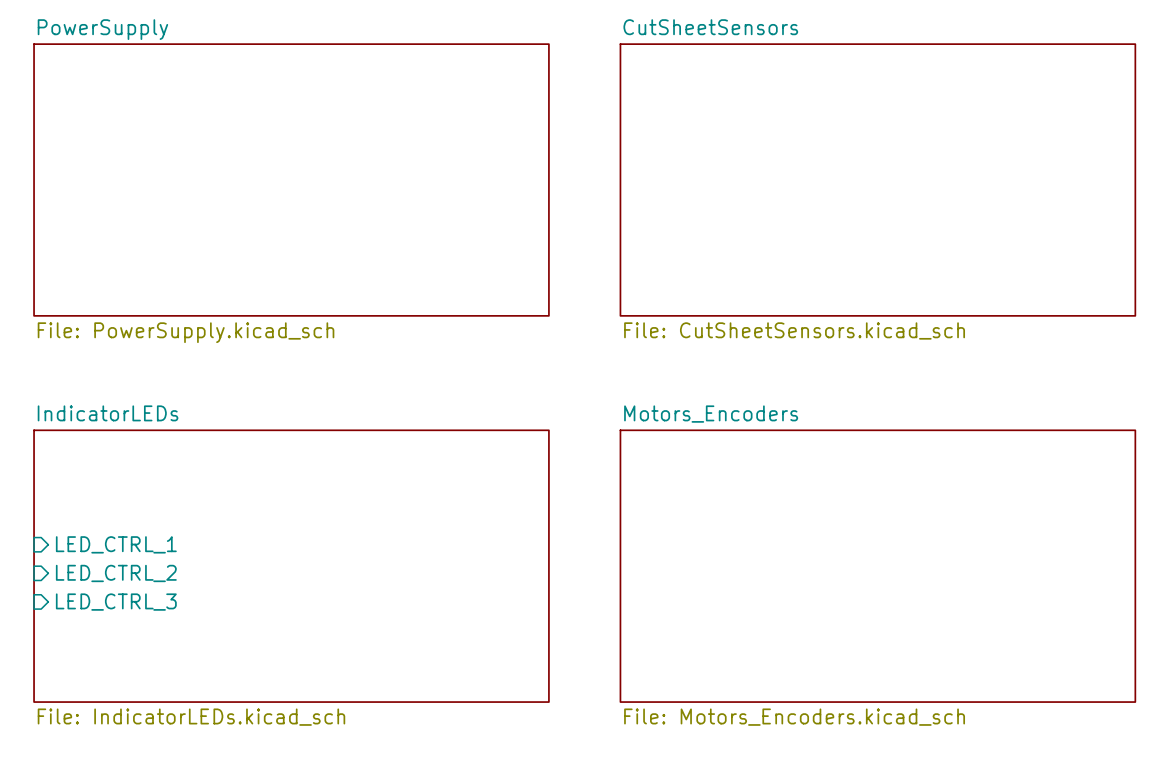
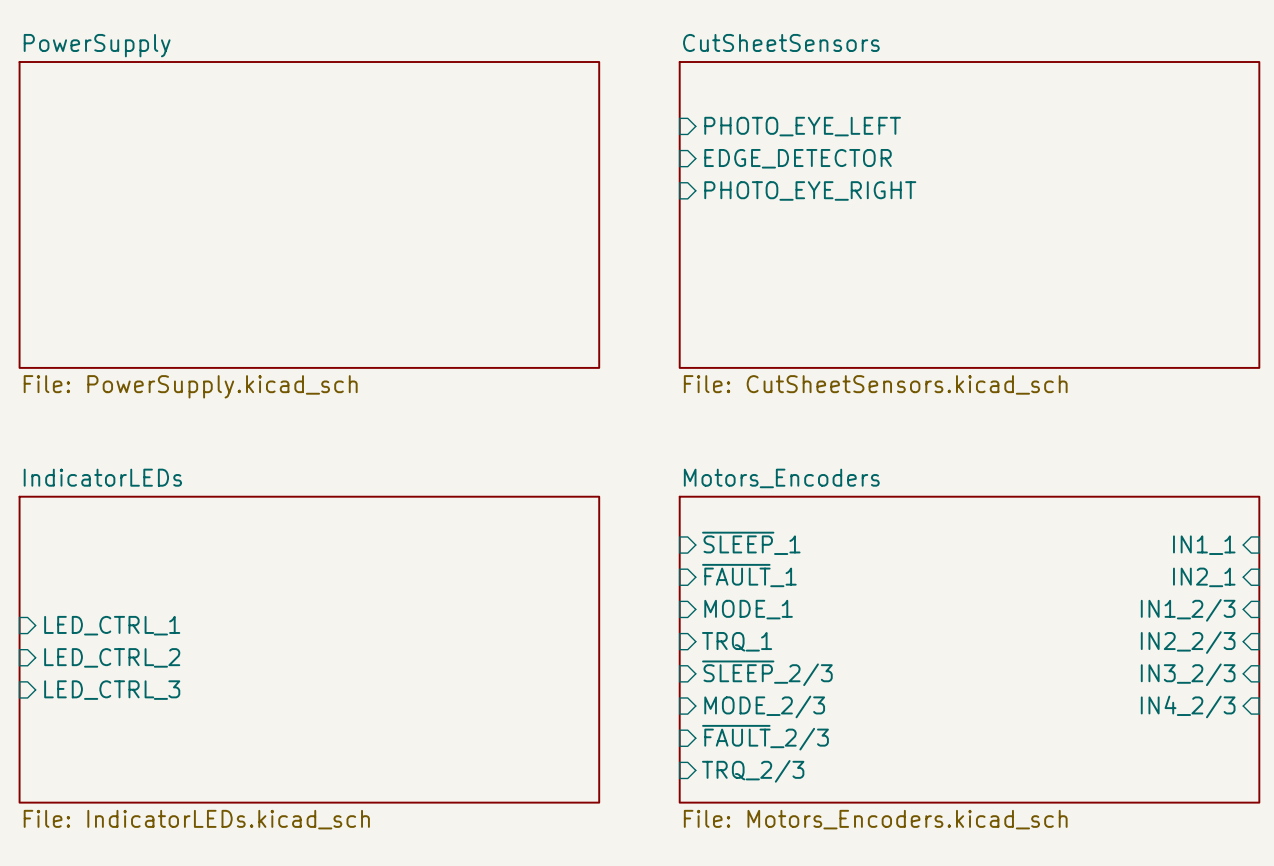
sheet pin: none -> PHOTO_EYE_LEFT (802, 126)
sheet pin: none -> EDGE_DETECTOR (798, 158)
sheet pin: none -> PHOTO_EYE_RIGHT (810, 190)
sheet pin: none -> ~{SLEEP}_1 (751, 543)
sheet pin: none -> IN1_1 (1204, 545)
sheet pin: none -> ~{FAULT}_1 (749, 575)
sheet pin: none -> IN2_1 (1204, 577)
sheet pin: none -> MODE_1 (748, 609)
sheet pin: none -> IN1_2/3 (1188, 610)
sheet pin: none -> TRQ_1 (737, 641)
sheet pin: none -> IN2_2/3 (1188, 642)
sheet pin: none -> ~{SLEEP}_2/3 (767, 673)
sheet pin: none -> IN3_2/3 (1188, 674)
sheet pin: none -> MODE_2/3 (764, 706)
sheet pin: none -> IN4_2/3 (1188, 706)
sheet pin: none -> ~{FAULT}_2/3 (765, 737)
sheet pin: none -> TRQ_2/3 (753, 771)

